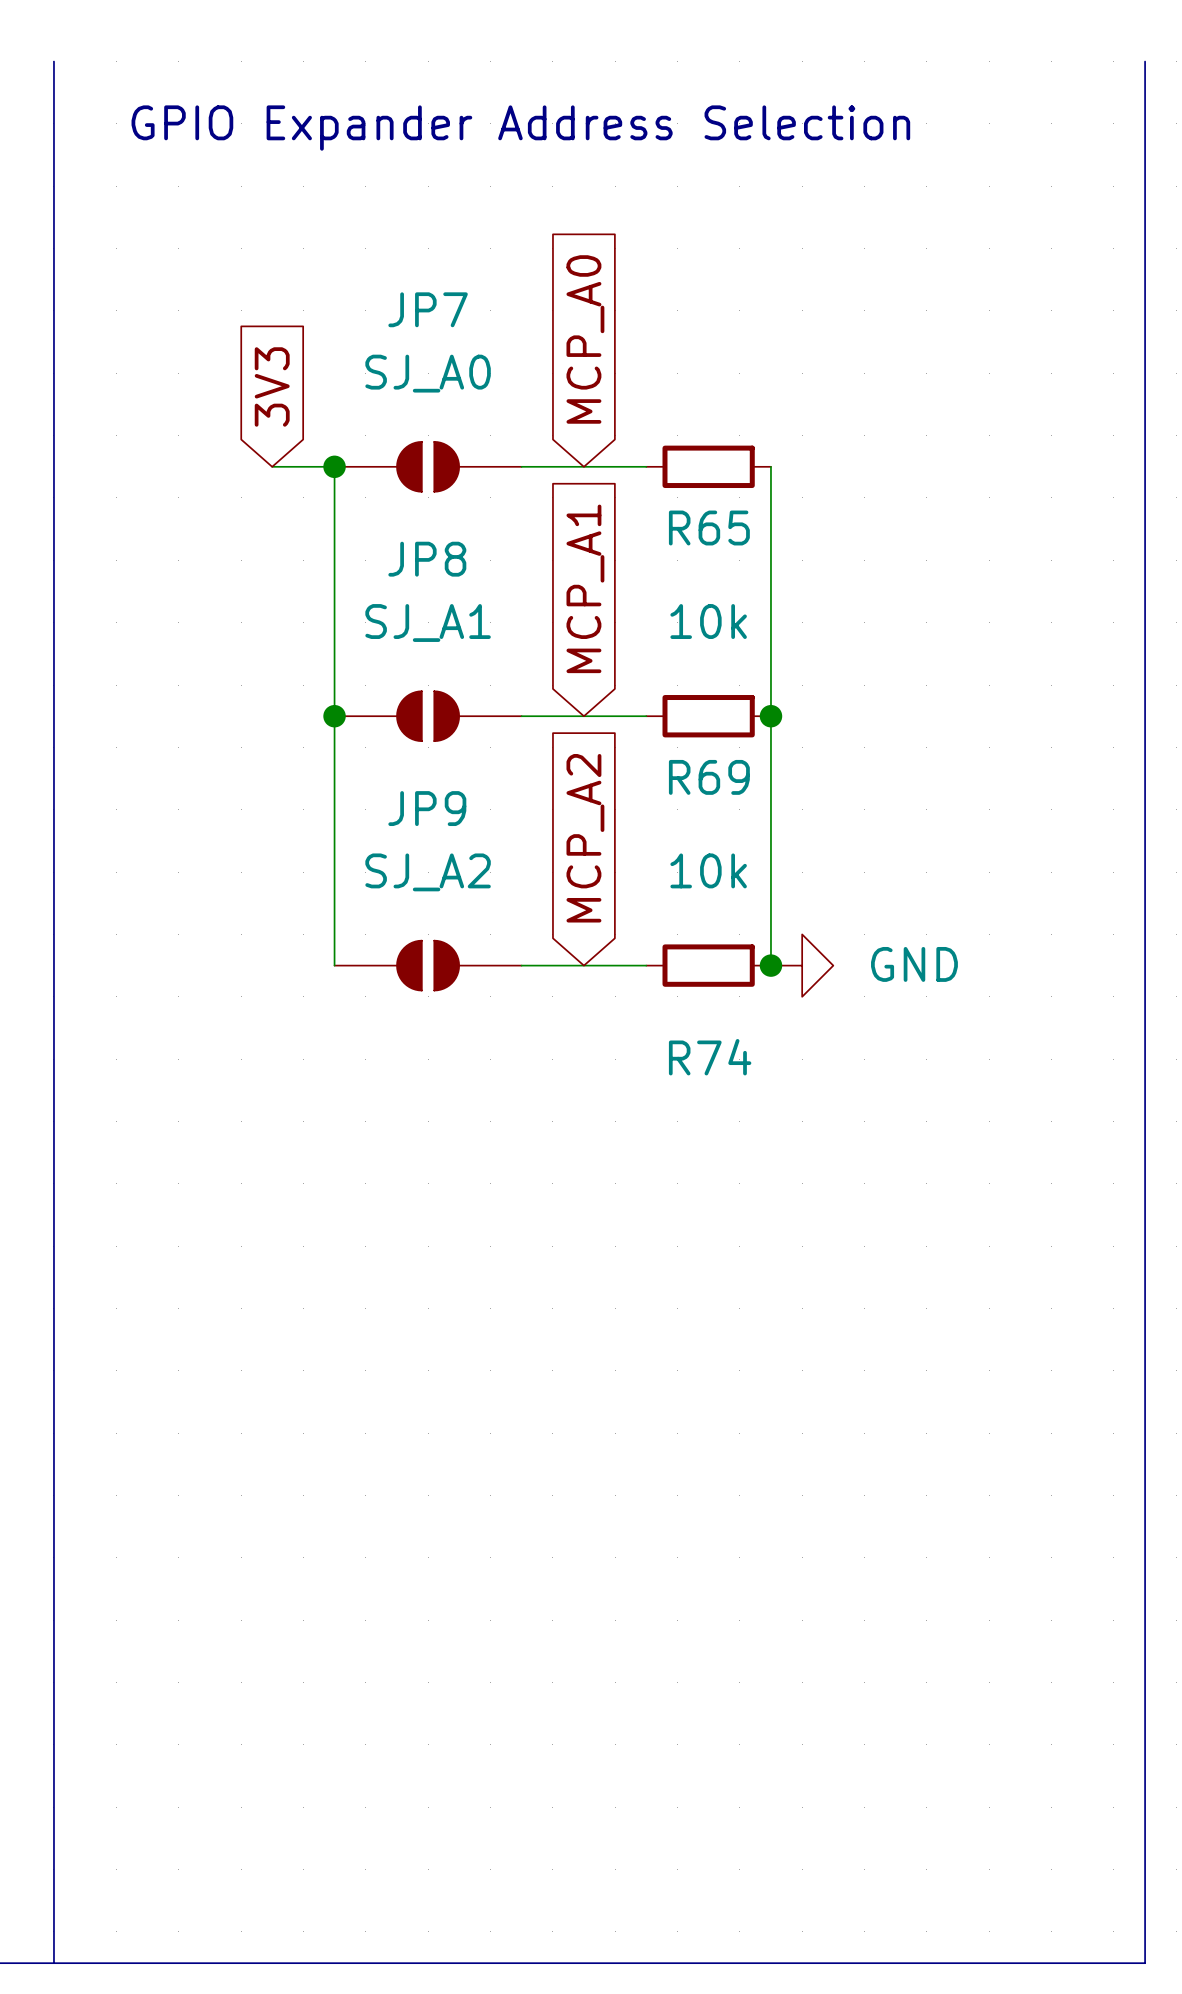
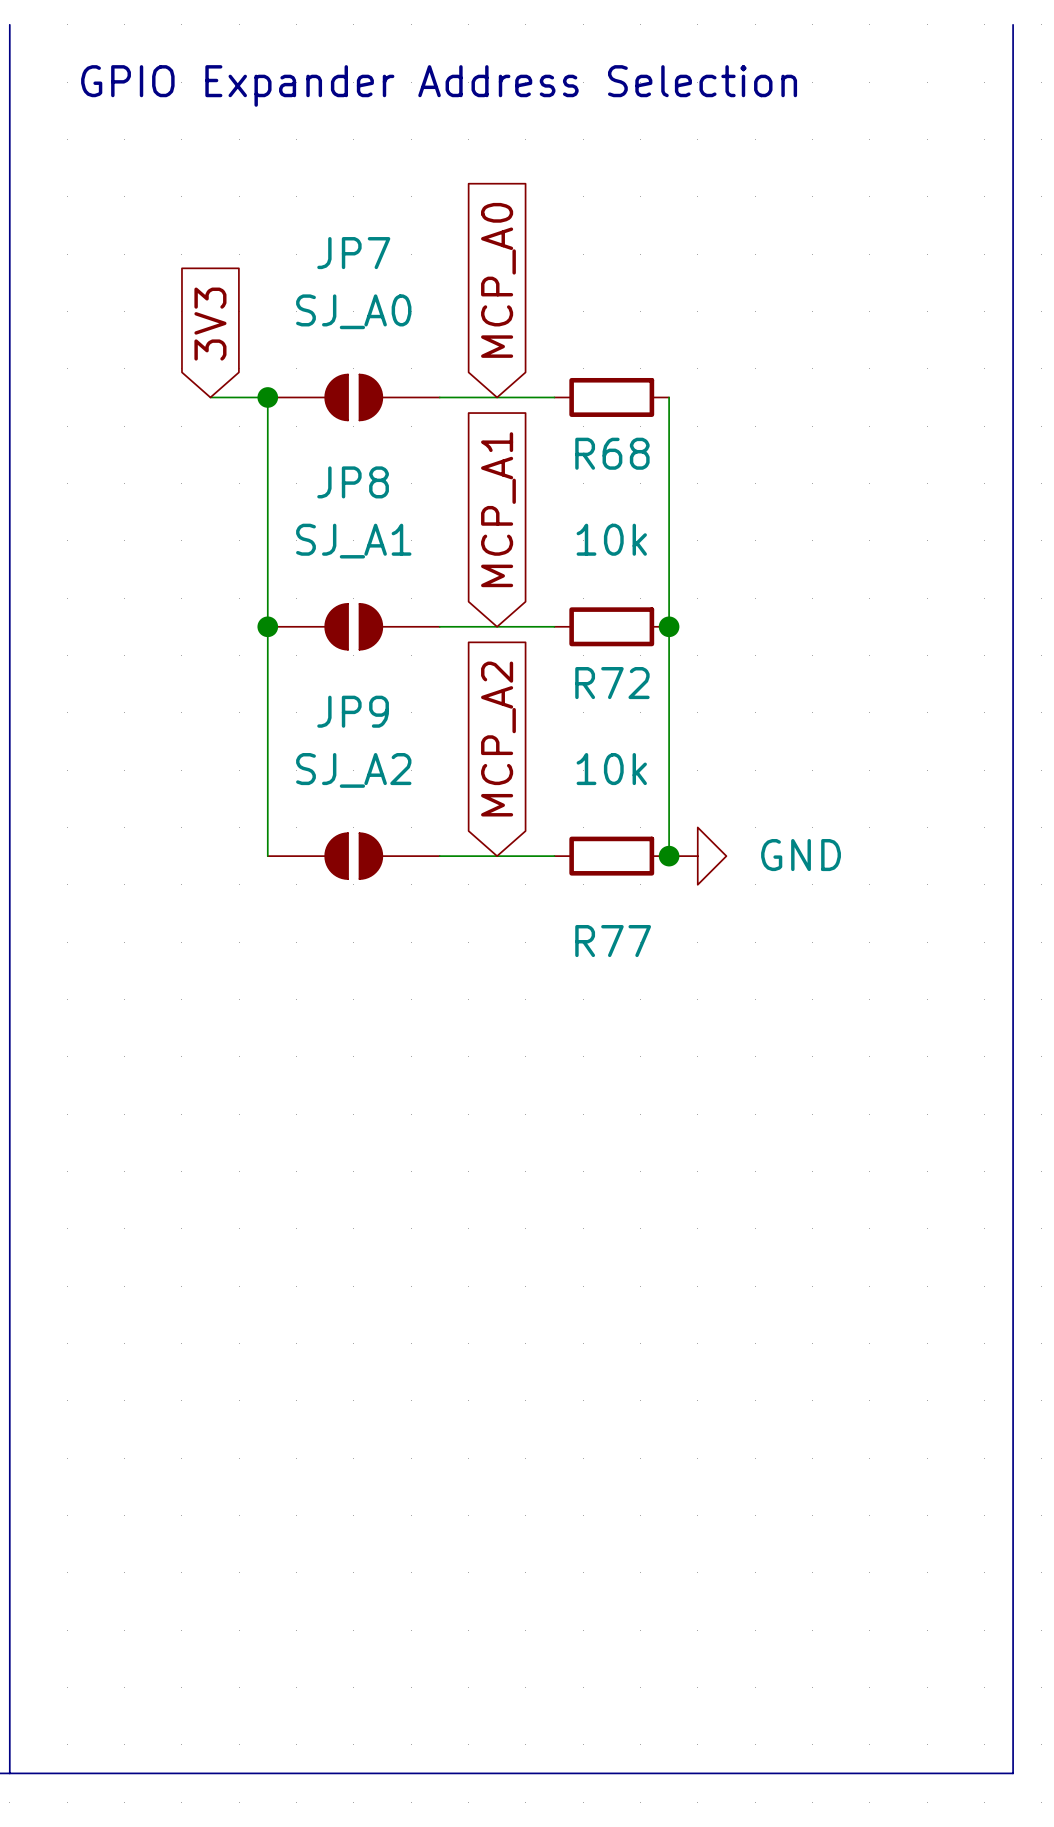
R65 name: R65 (709, 528) -> R68 (612, 453)
R69 name: R69 (709, 777) -> R72 (612, 683)
R74 name: R74 (710, 1057) -> R77 (613, 941)

